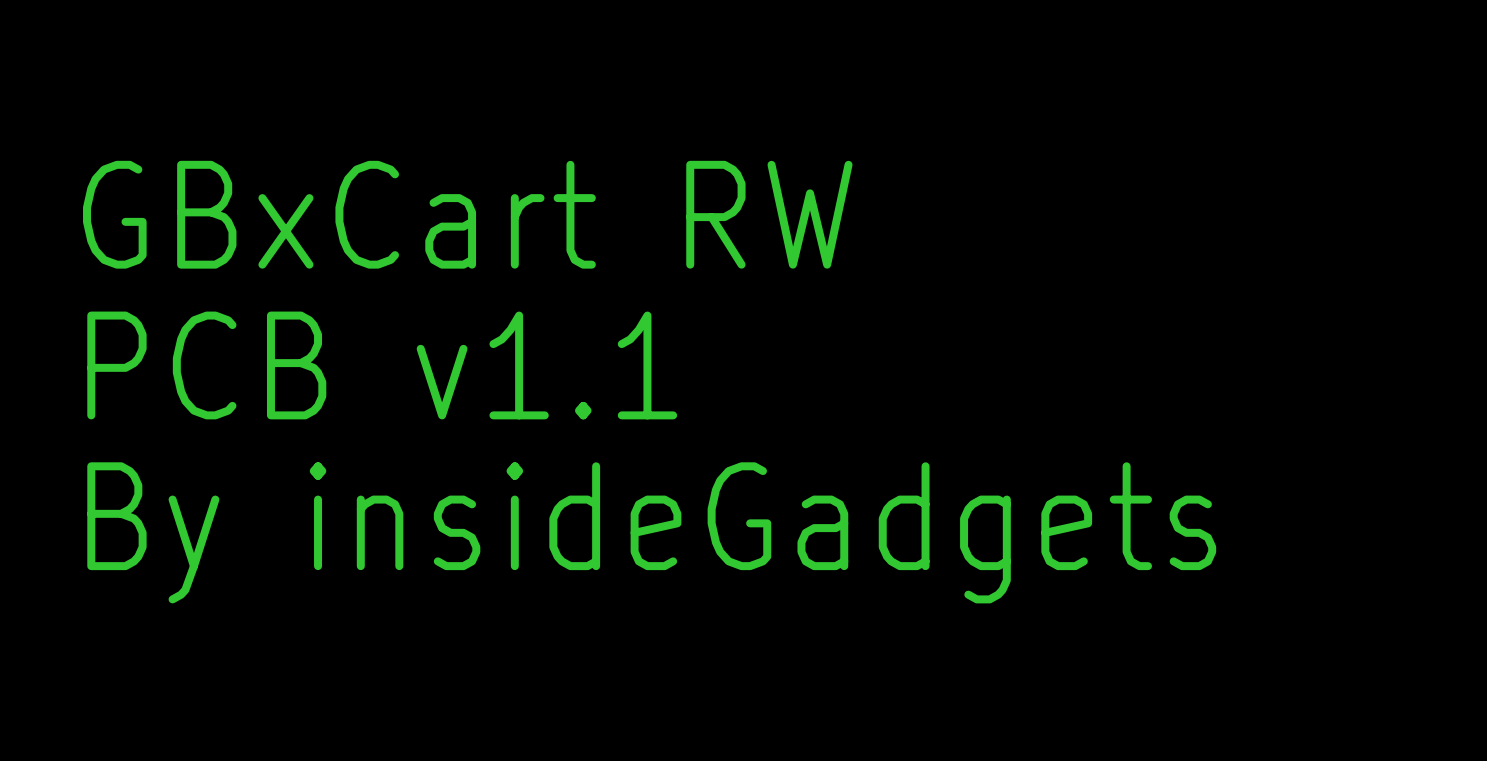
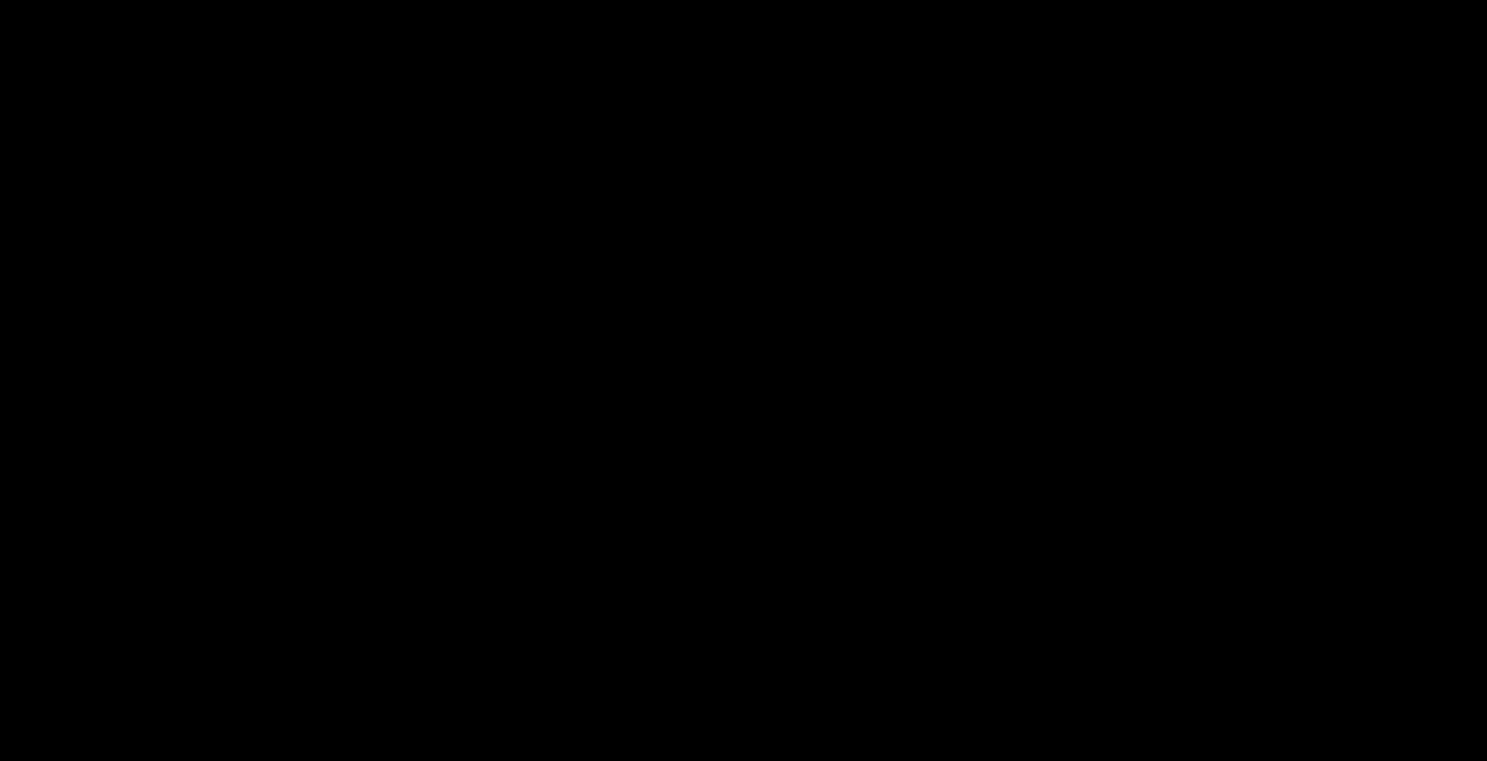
text: GBxCart RW (467, 214) -> none
text: PCB v1.1 (382, 365) -> none
text: By insideGadgets (651, 532) -> none

